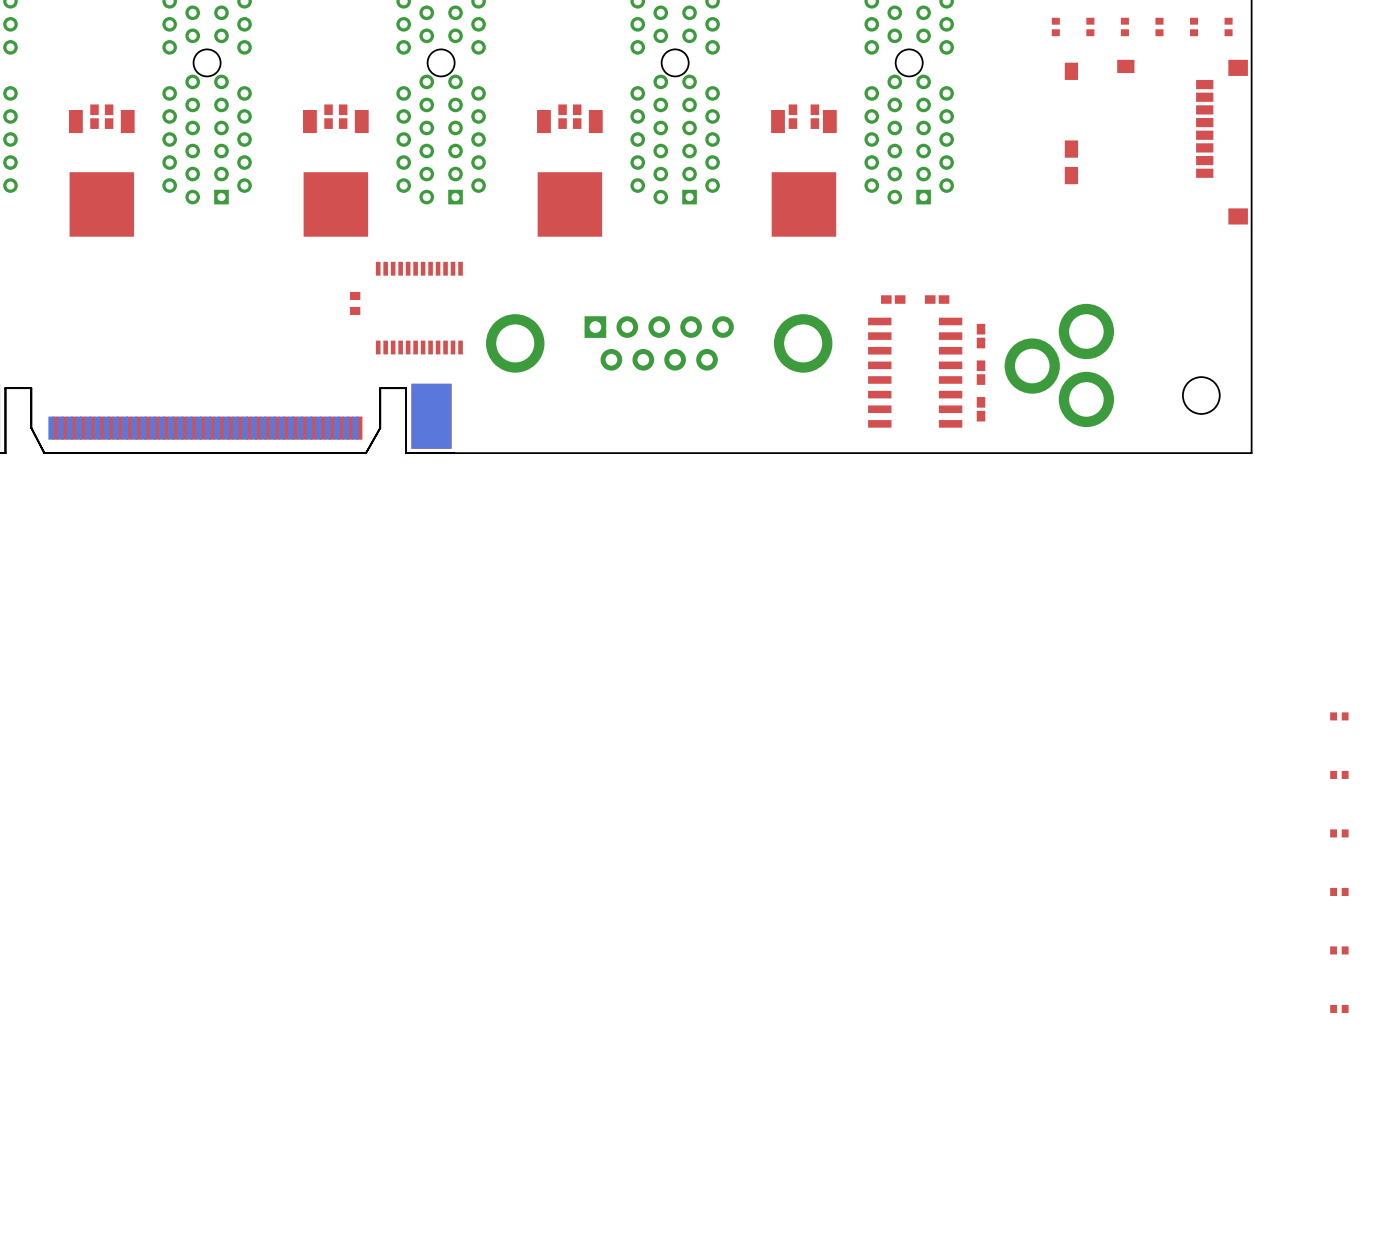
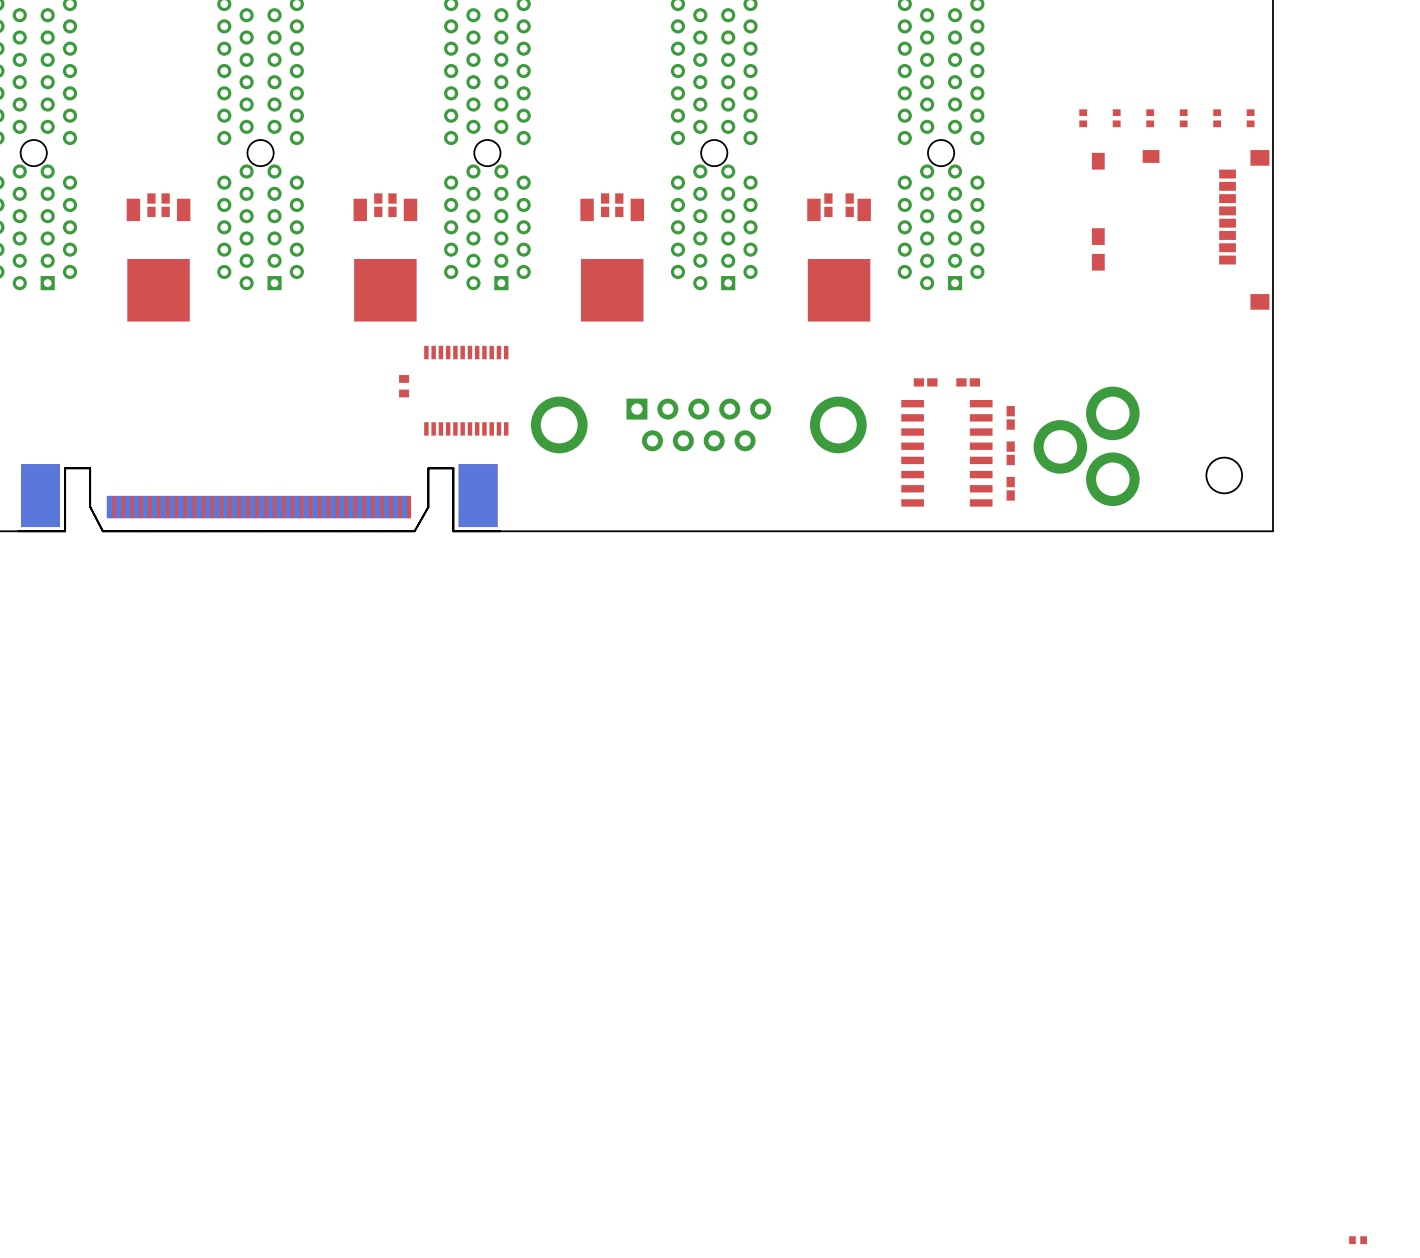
part: (1339, 716) -> none
part: (1339, 774) -> none
part: (1339, 833) -> none
part: (1339, 891) -> none
part: (1339, 950) -> none
part: (1339, 1008) -> none
part: none -> (1358, 1240)

